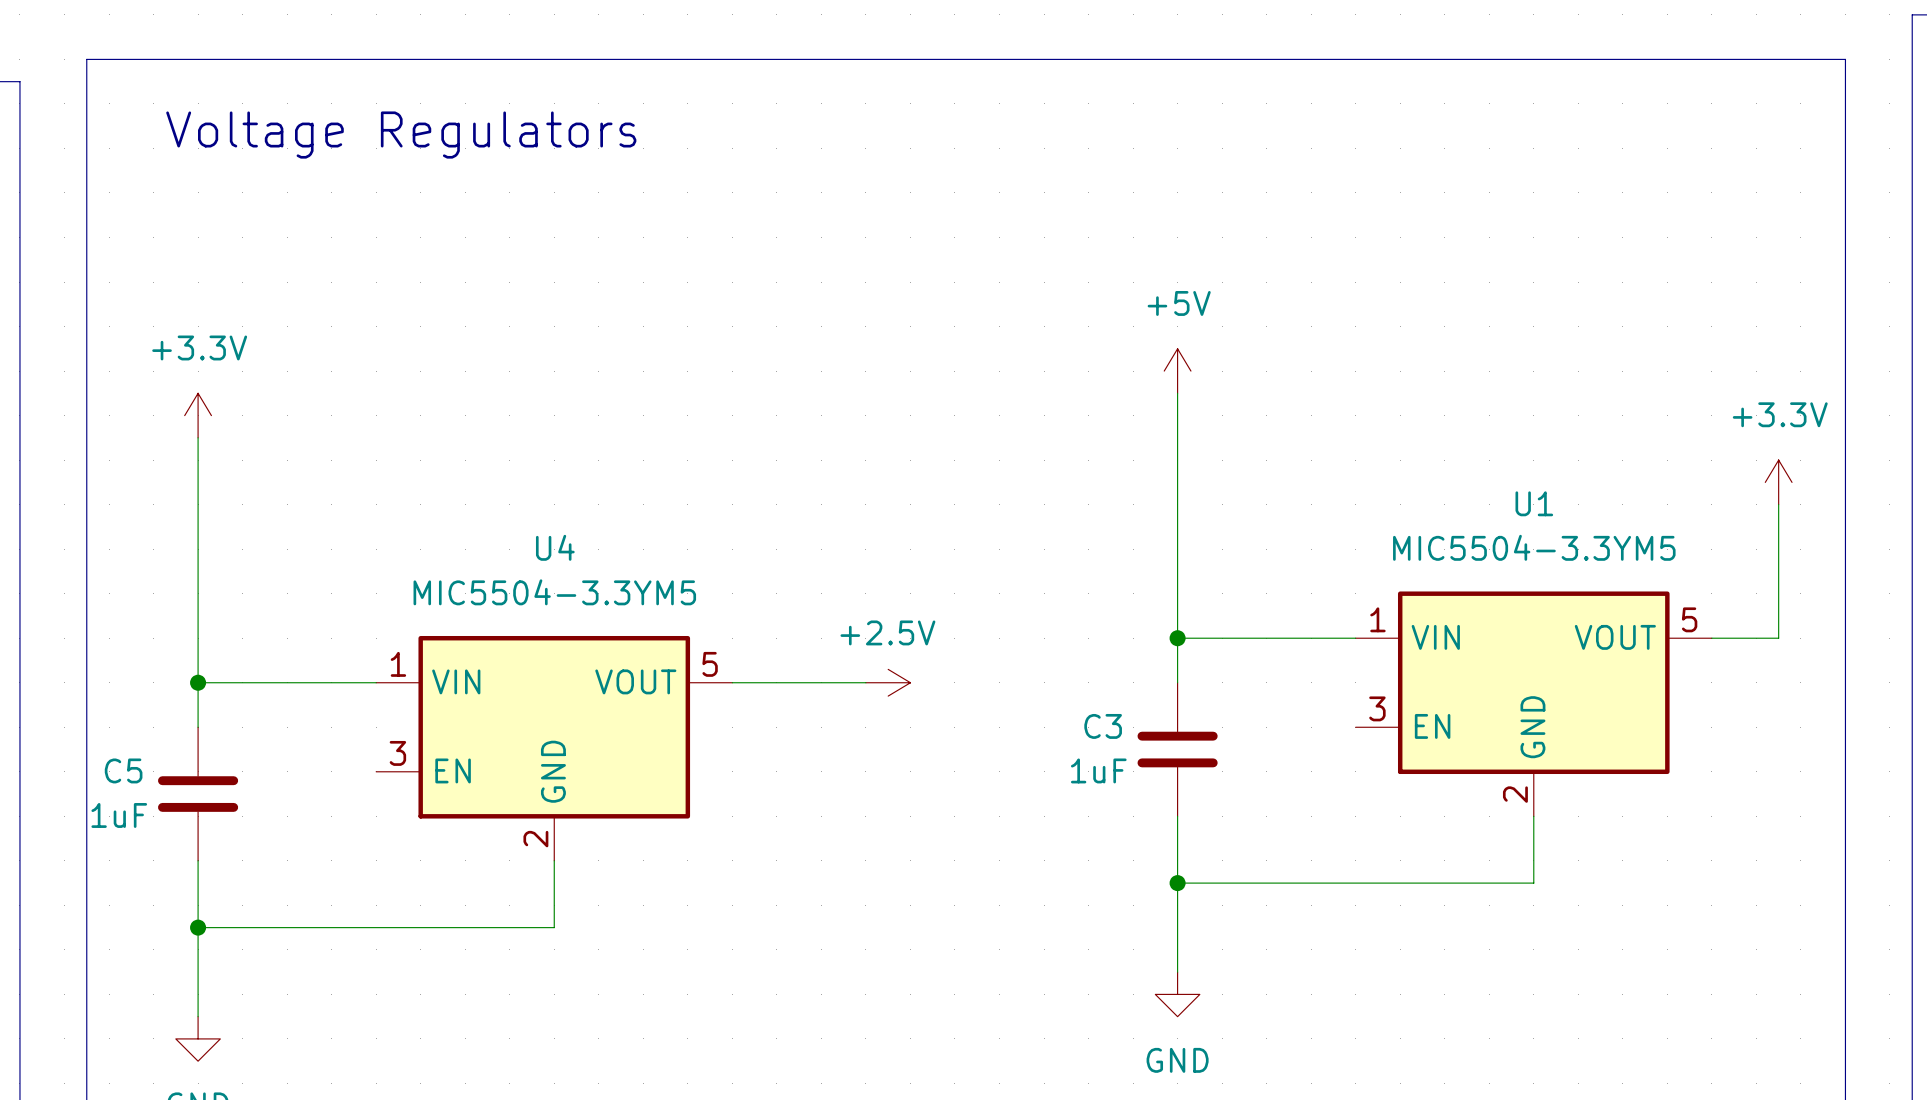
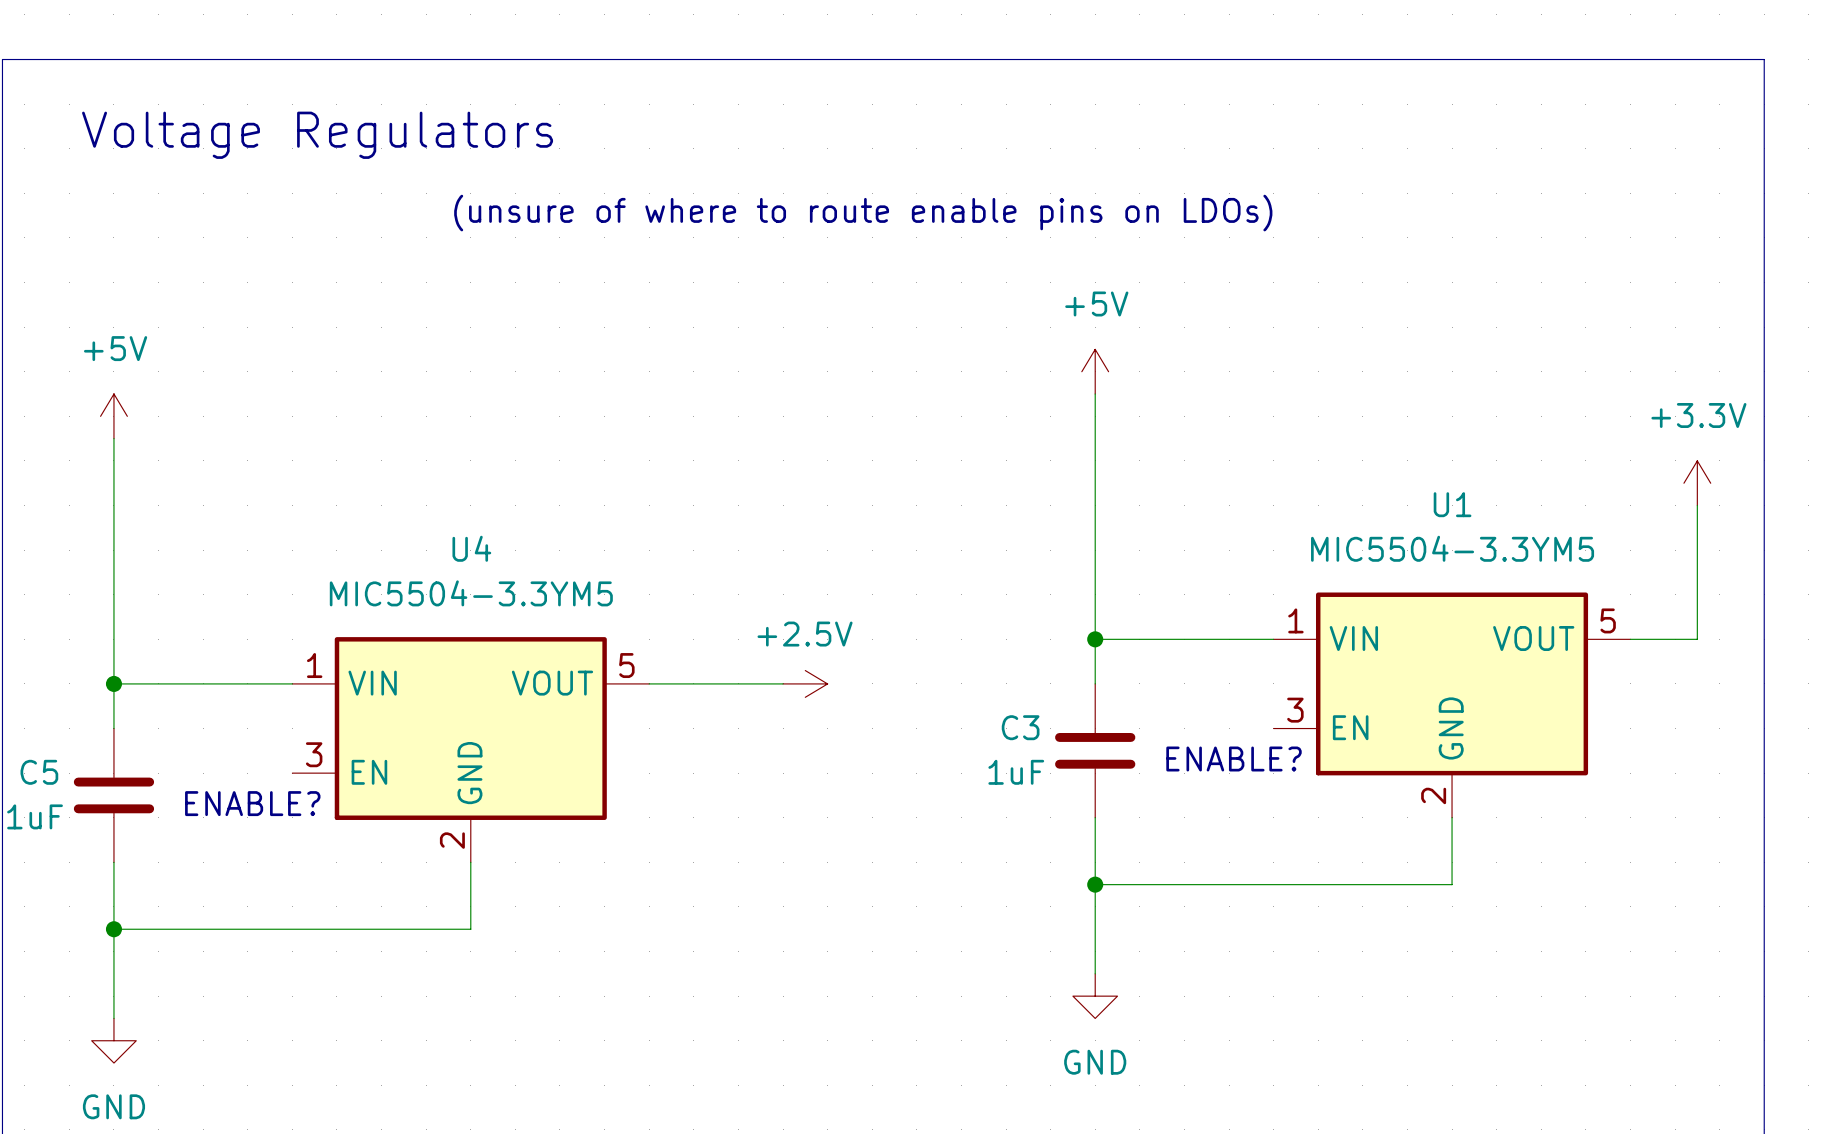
text: none -> (unsure of where to route enable pins on LDOs) (863, 213)
power symbol: +3.3V (198, 415) -> +5V (113, 416)
text: none -> ENABLE? (1234, 758)
text: none -> ENABLE? (252, 803)

